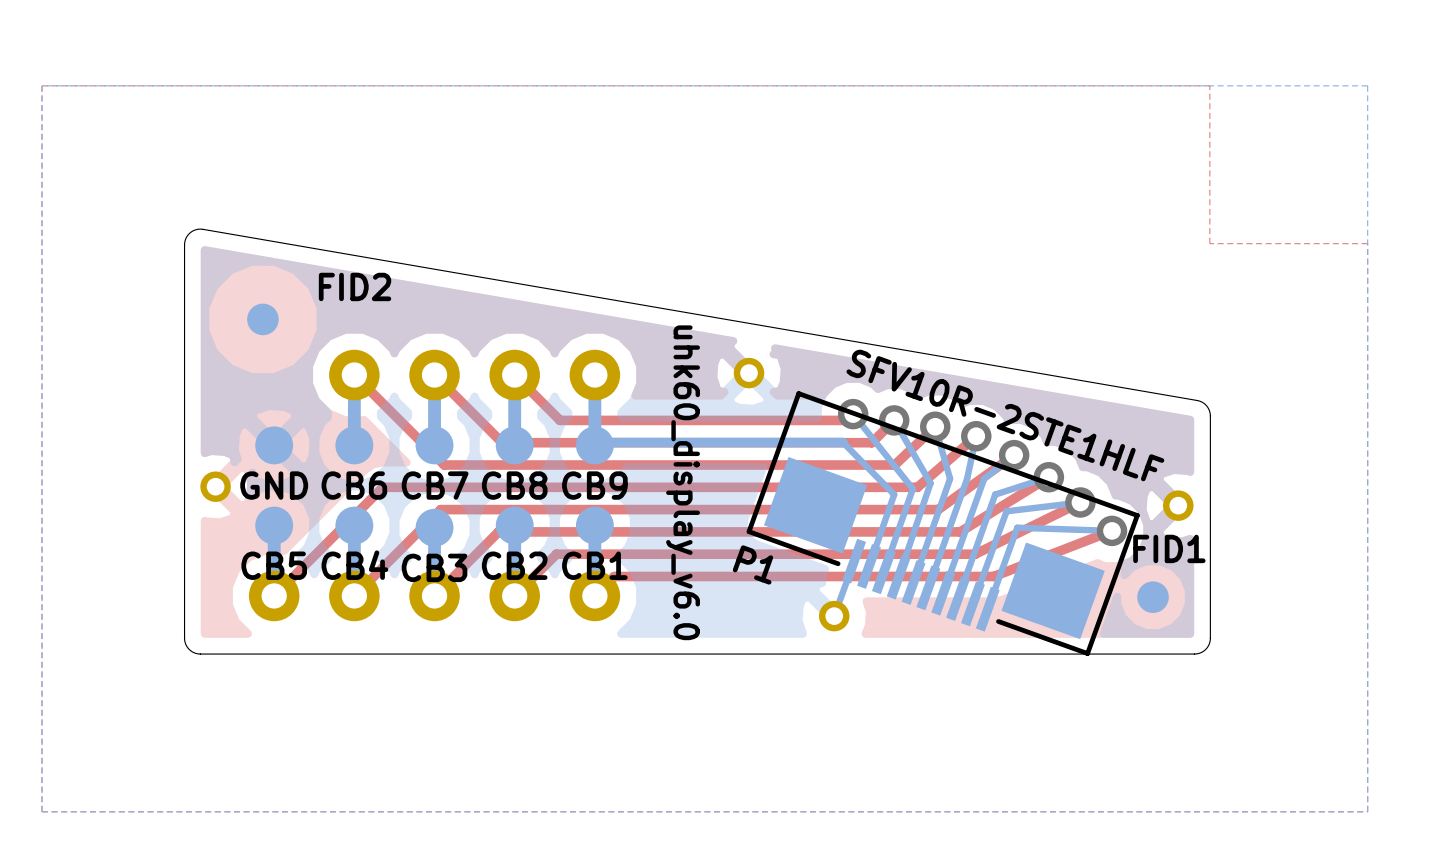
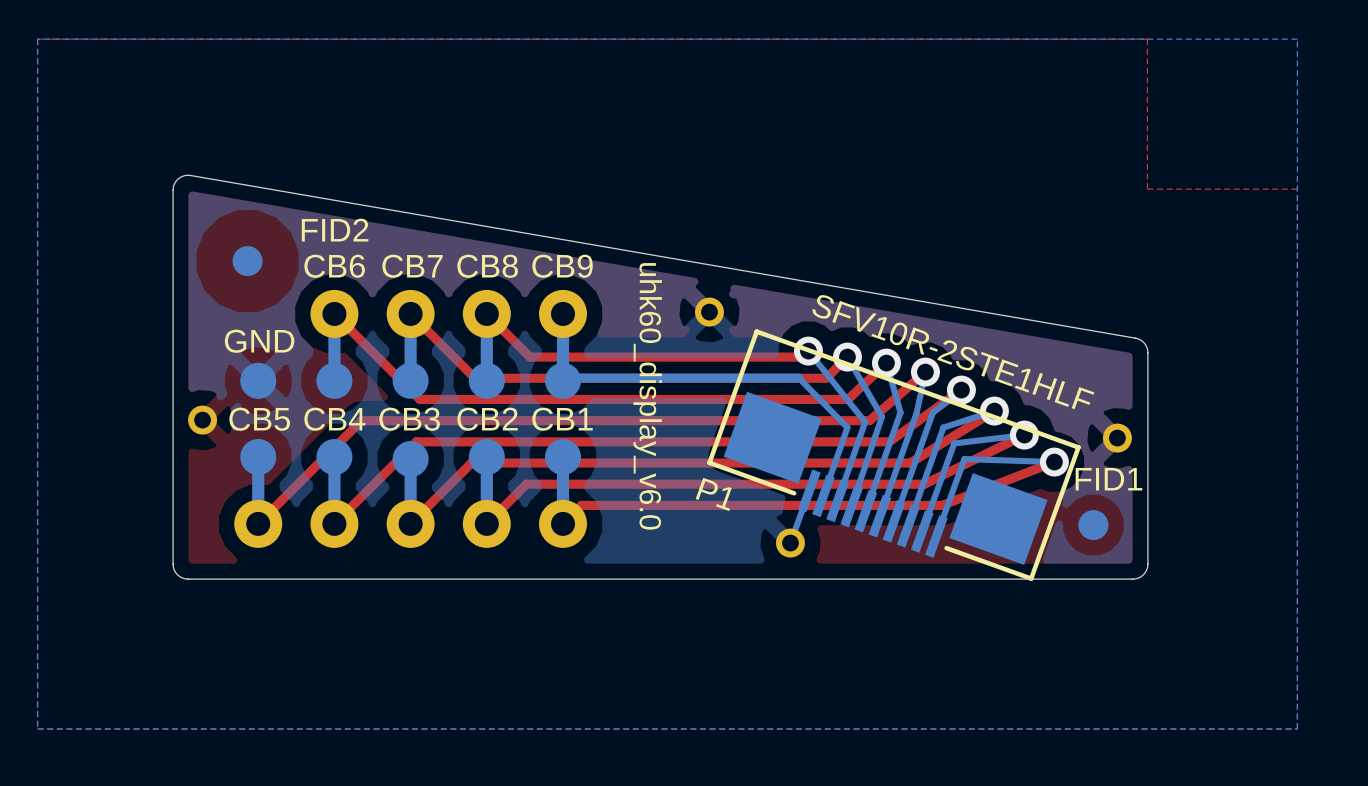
part value position: GND (274, 485) -> GND (259, 341)
part value position: CB6 (354, 485) -> CB6 (334, 266)
part value position: CB7 (435, 485) -> CB7 (412, 266)
part value position: CB8 (514, 485) -> CB8 (487, 266)
part value position: CB9 (594, 485) -> CB9 (562, 266)
part value position: CB5 (274, 565) -> CB5 (259, 419)
part value position: CB4 (354, 565) -> CB4 (334, 419)
part value position: CB2 (514, 565) -> CB2 (487, 419)
part value position: CB1 (594, 565) -> CB1 (562, 419)
part value position: CB3 (434, 567) -> CB3 (409, 419)

